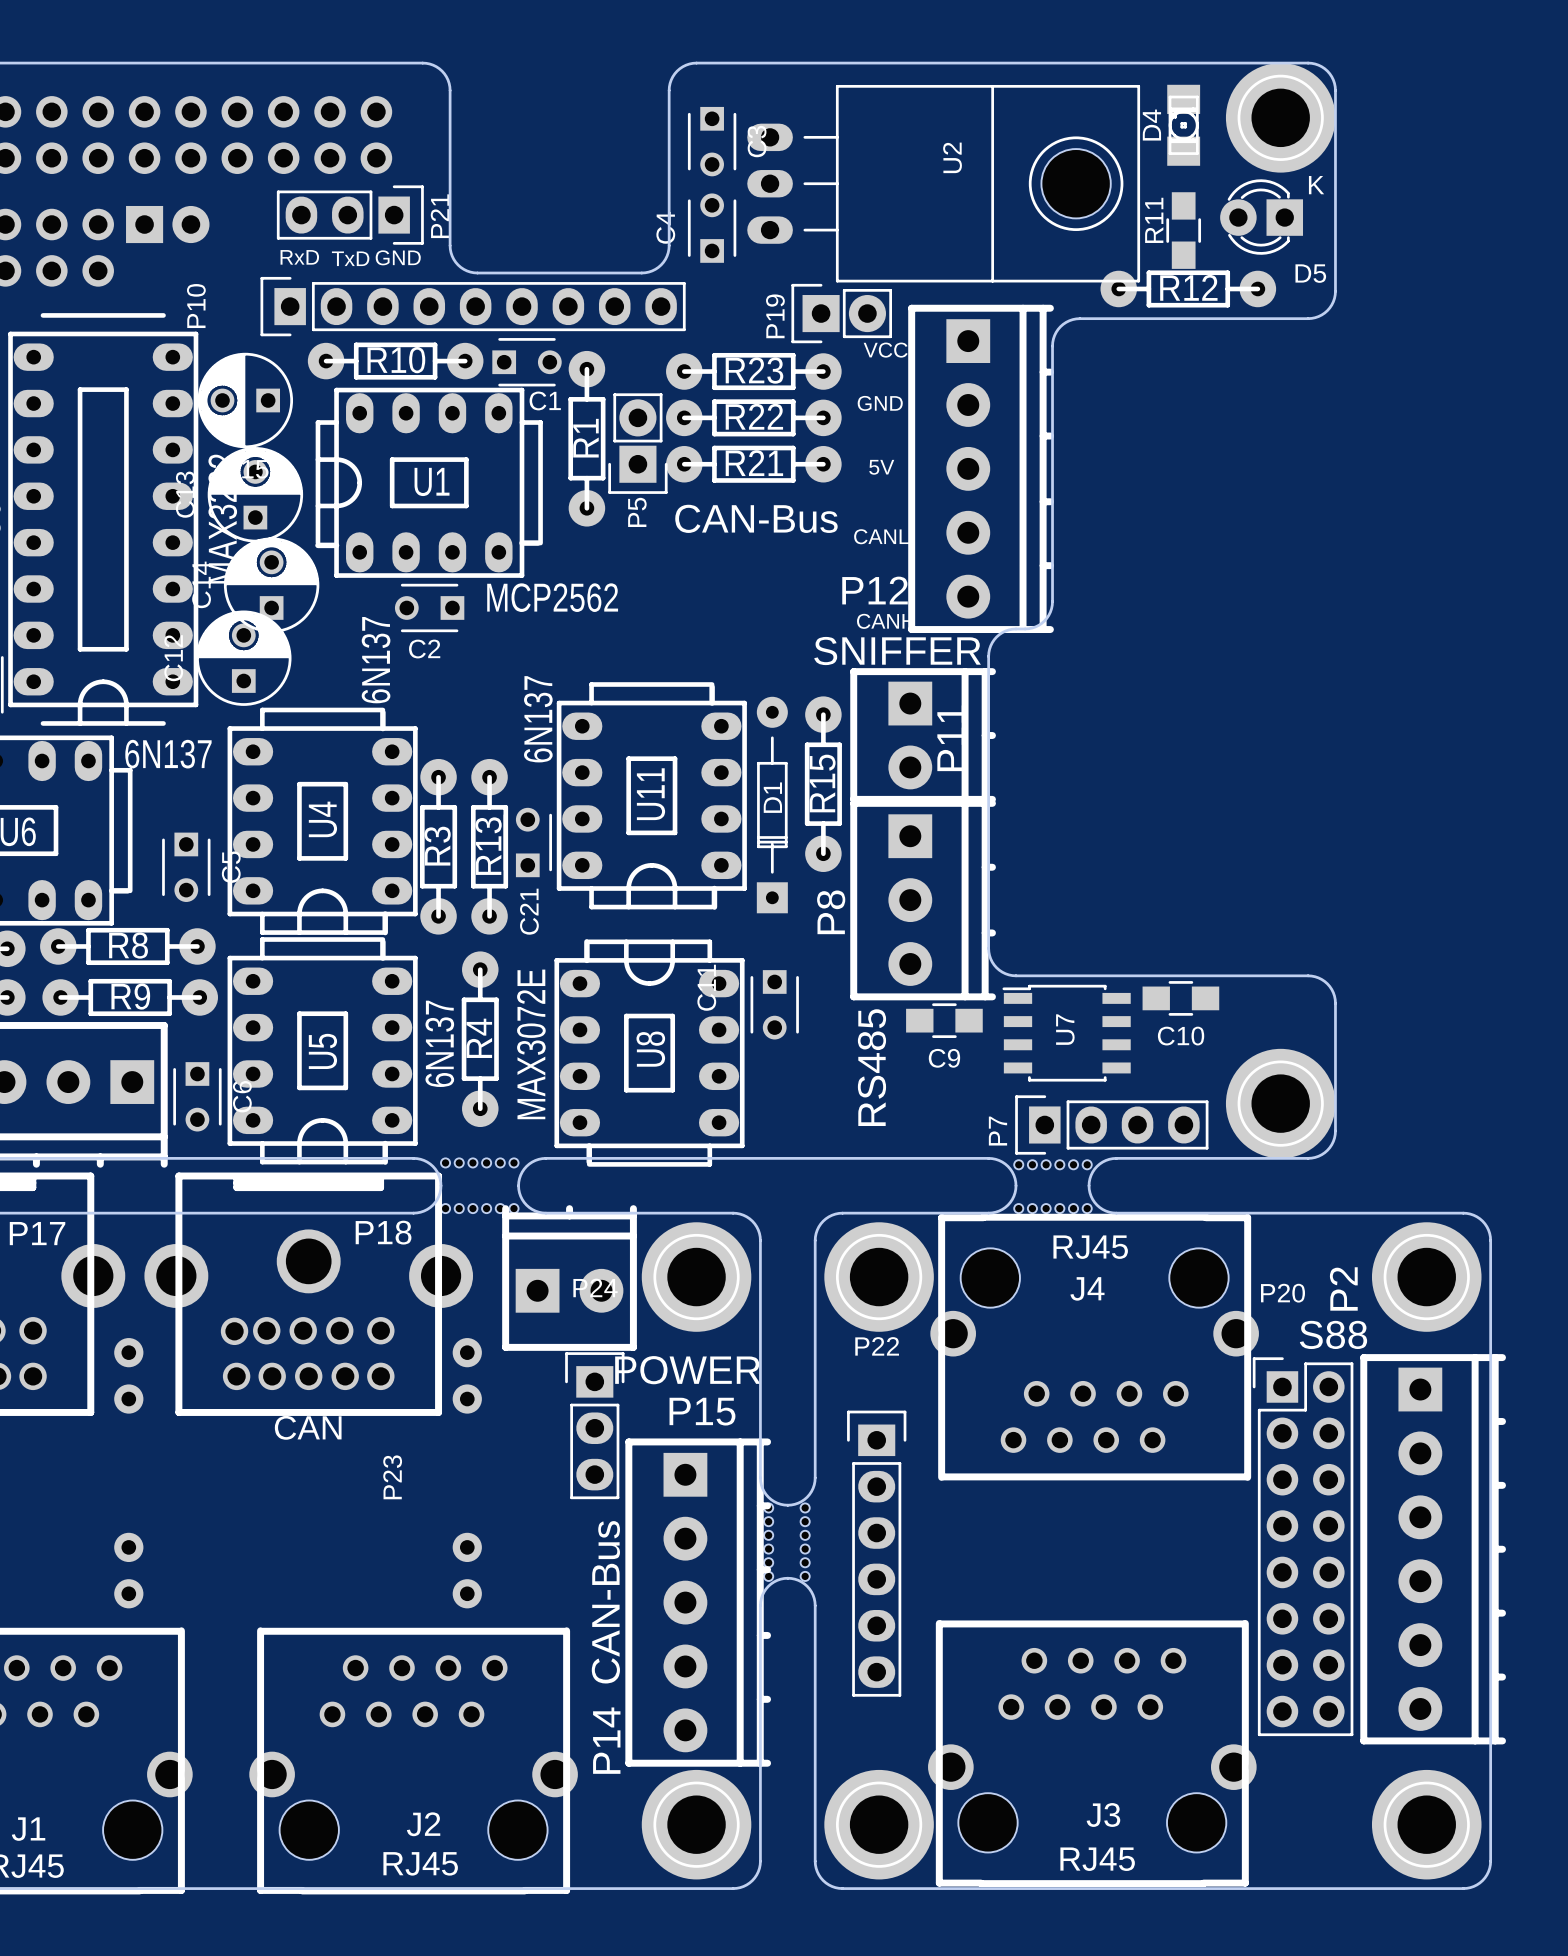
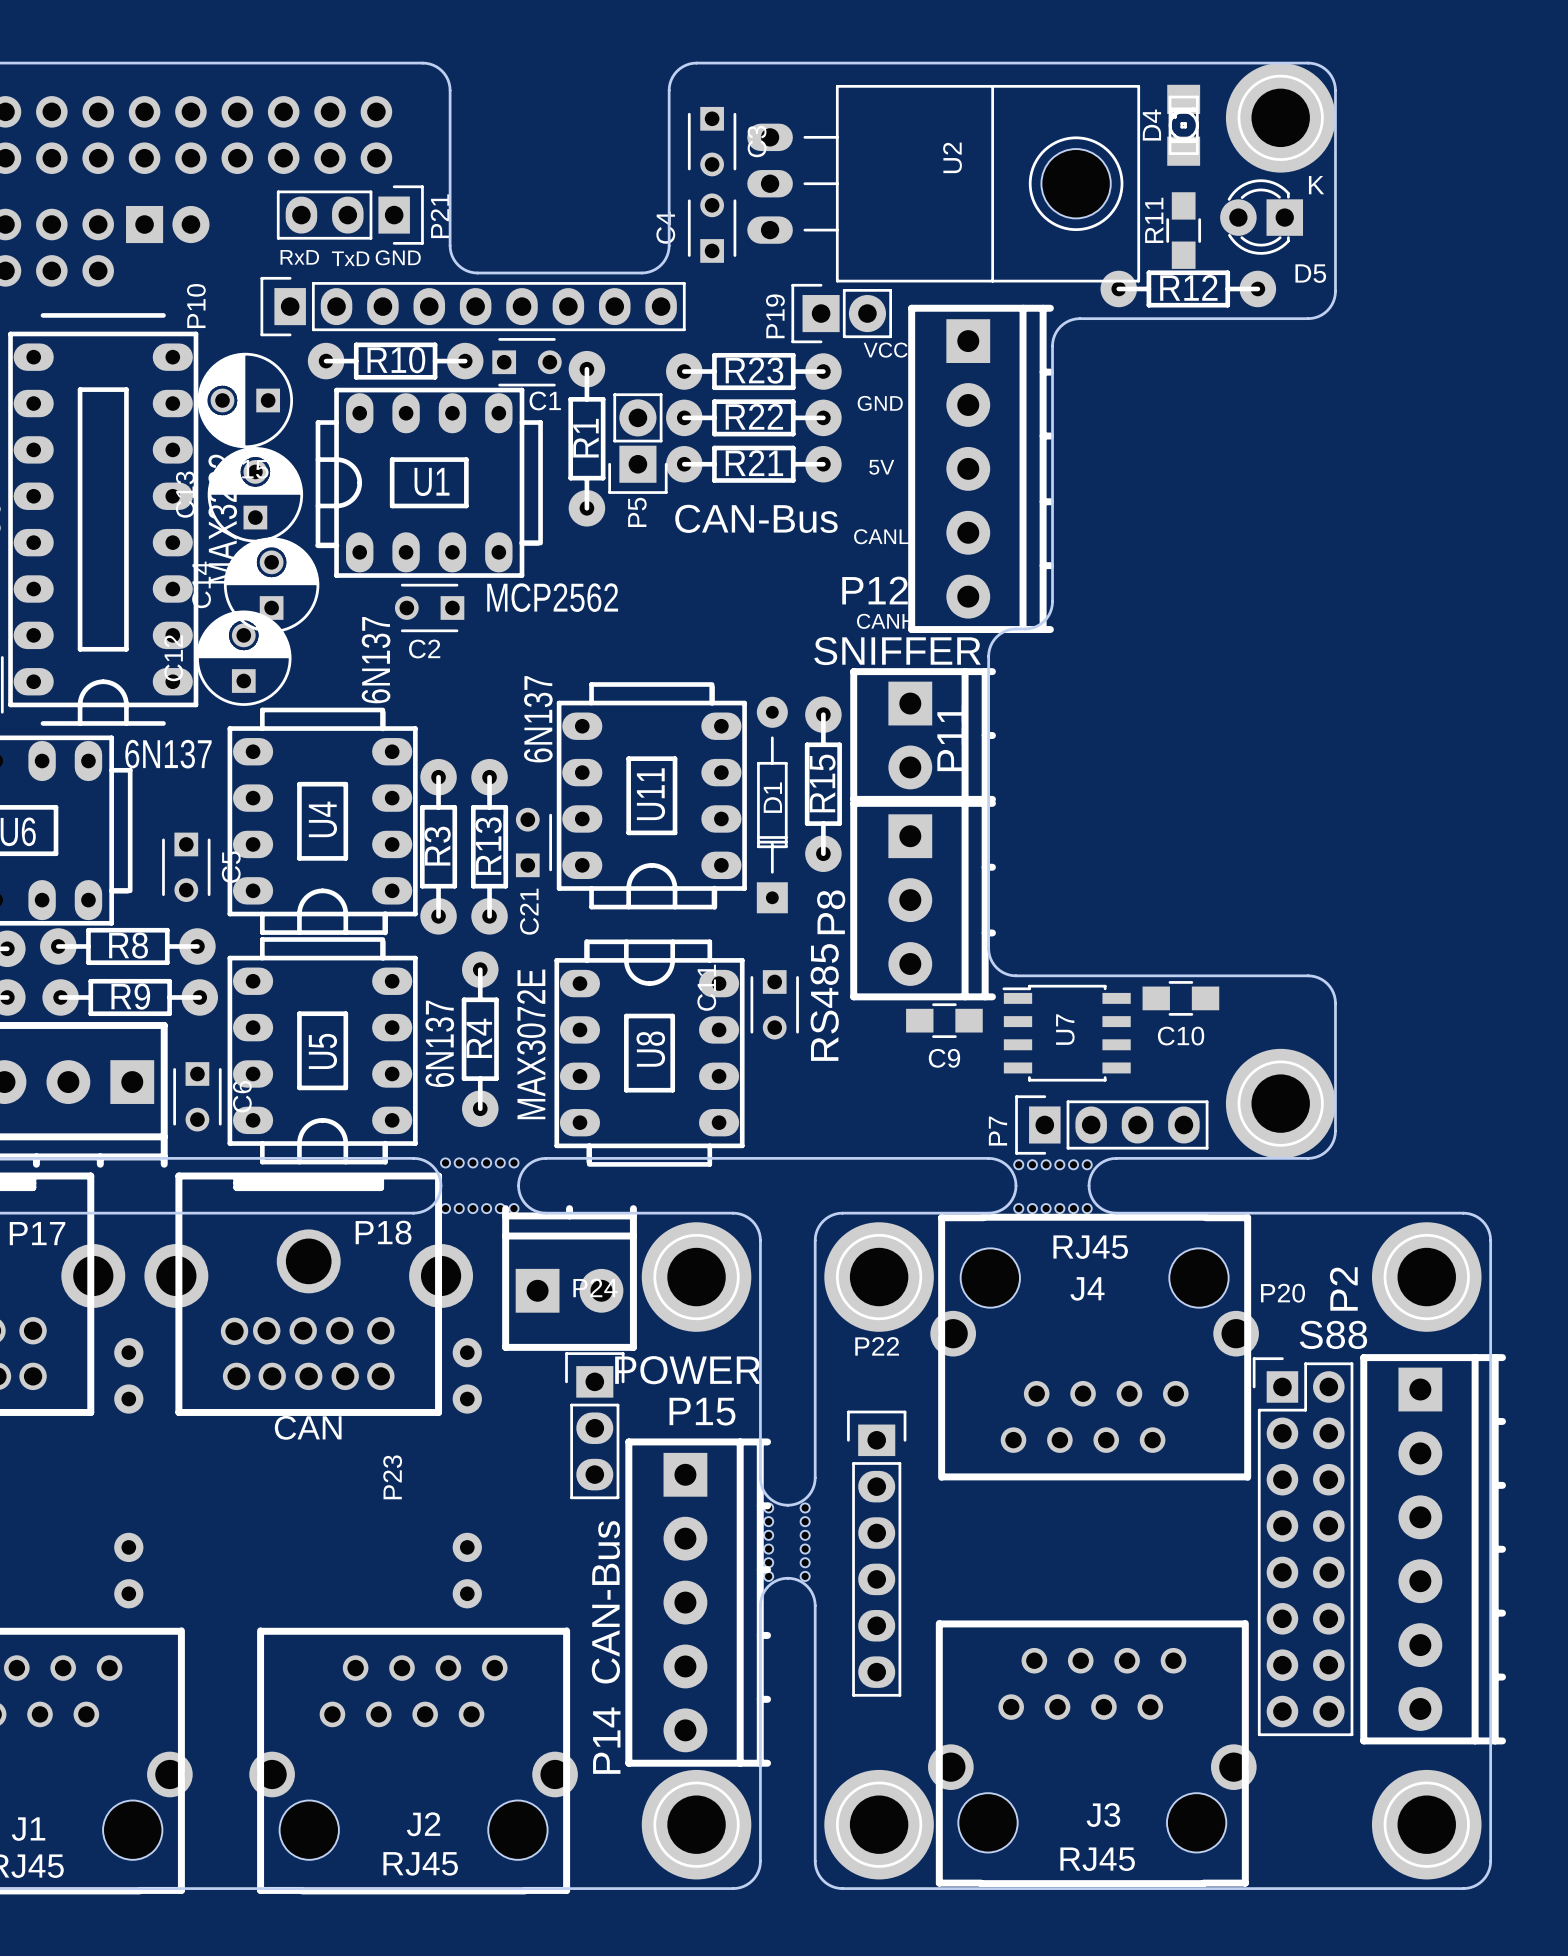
P8 value position: RS485 (871, 1067) -> RS485 (824, 1002)

